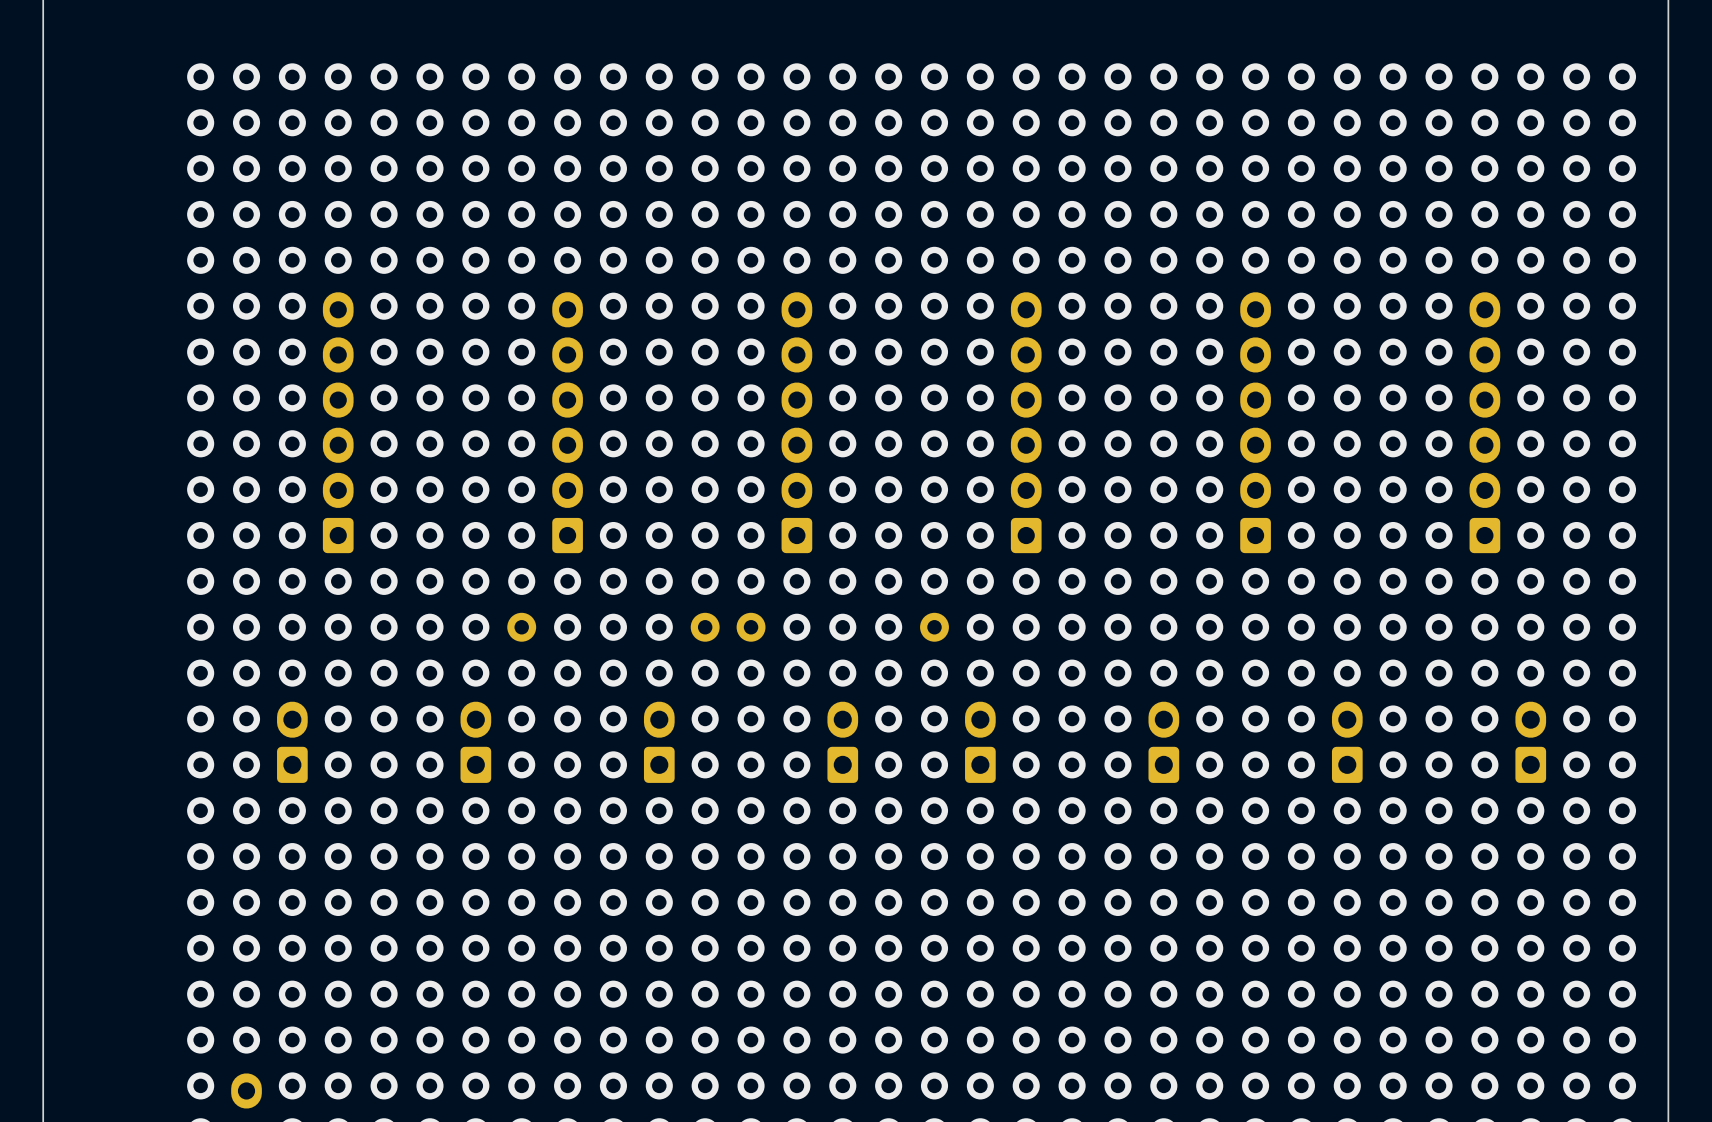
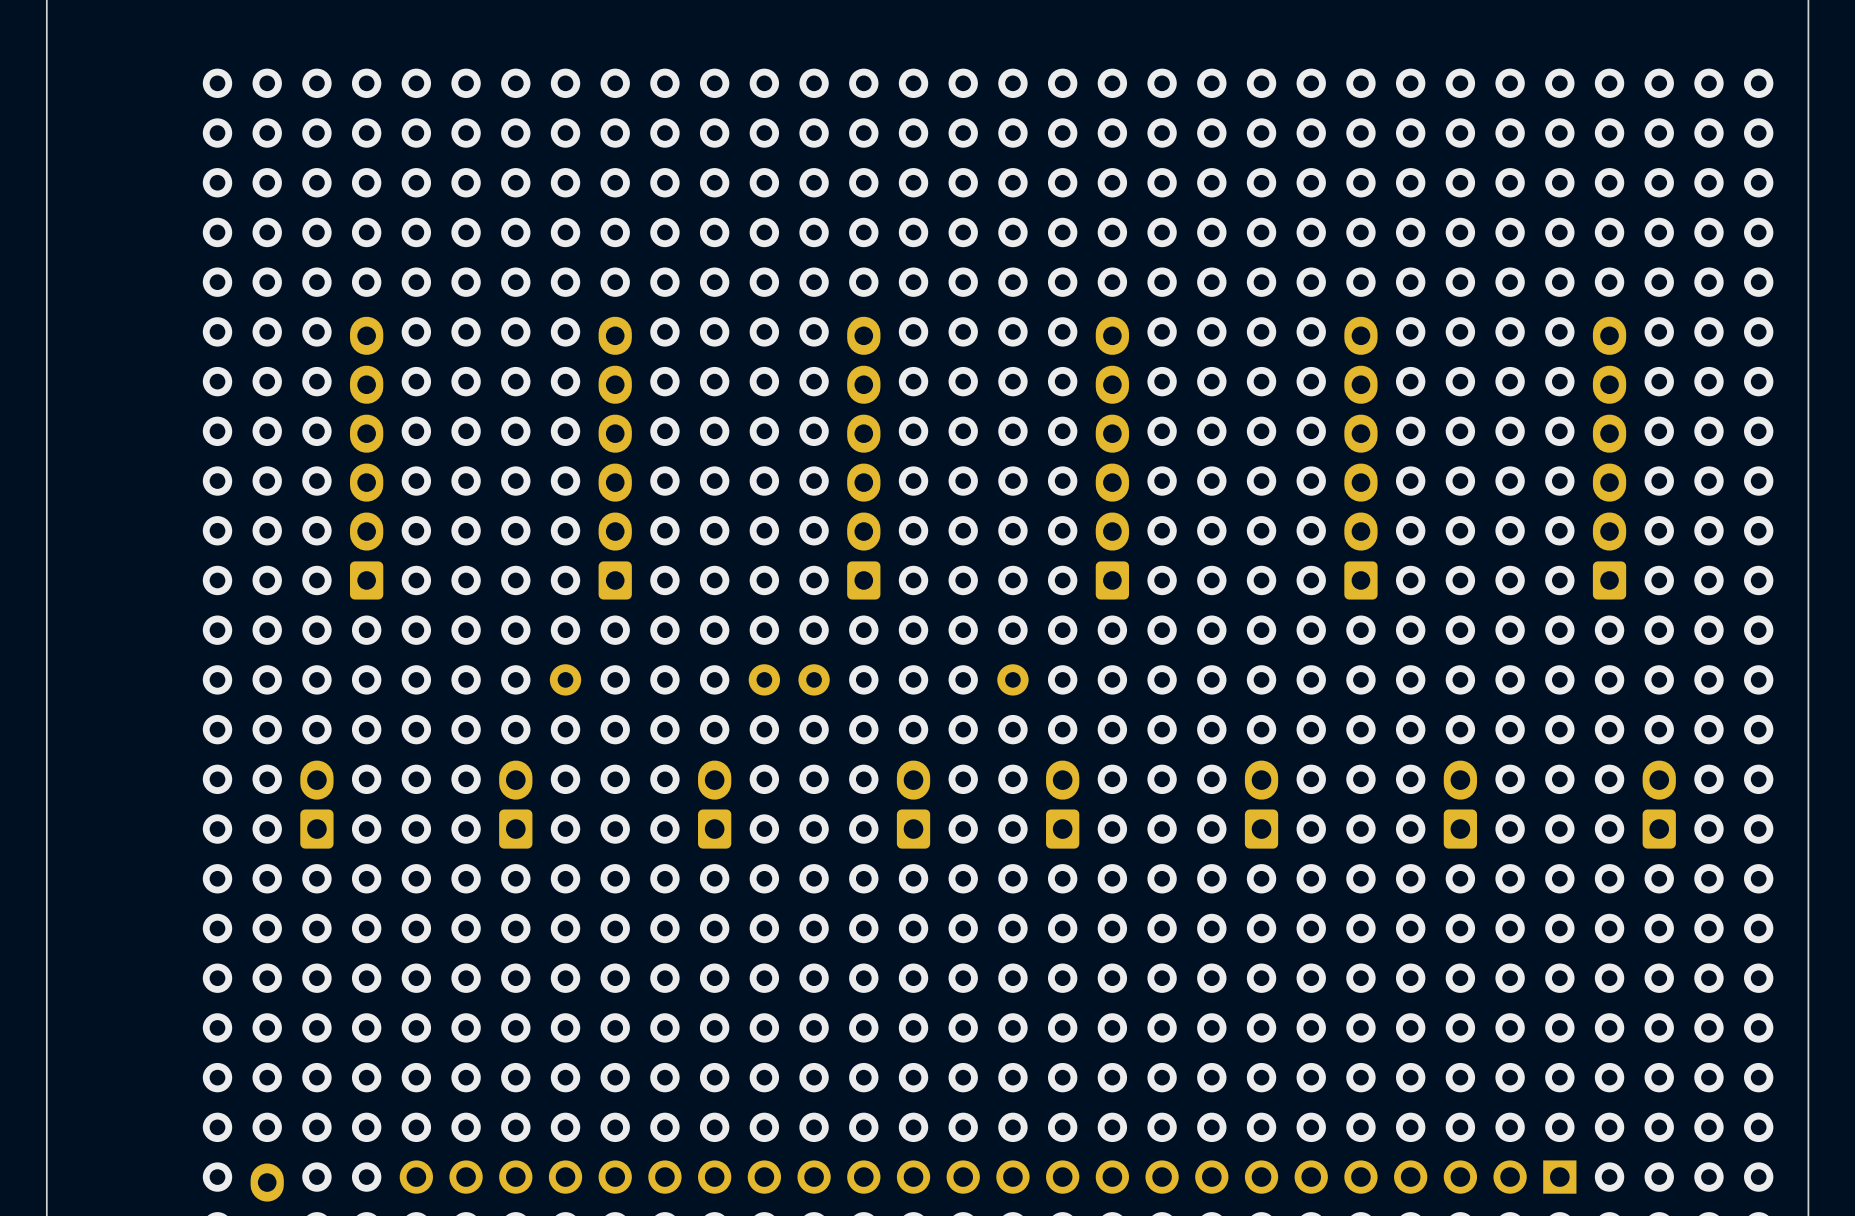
part: none -> (988, 1177)

